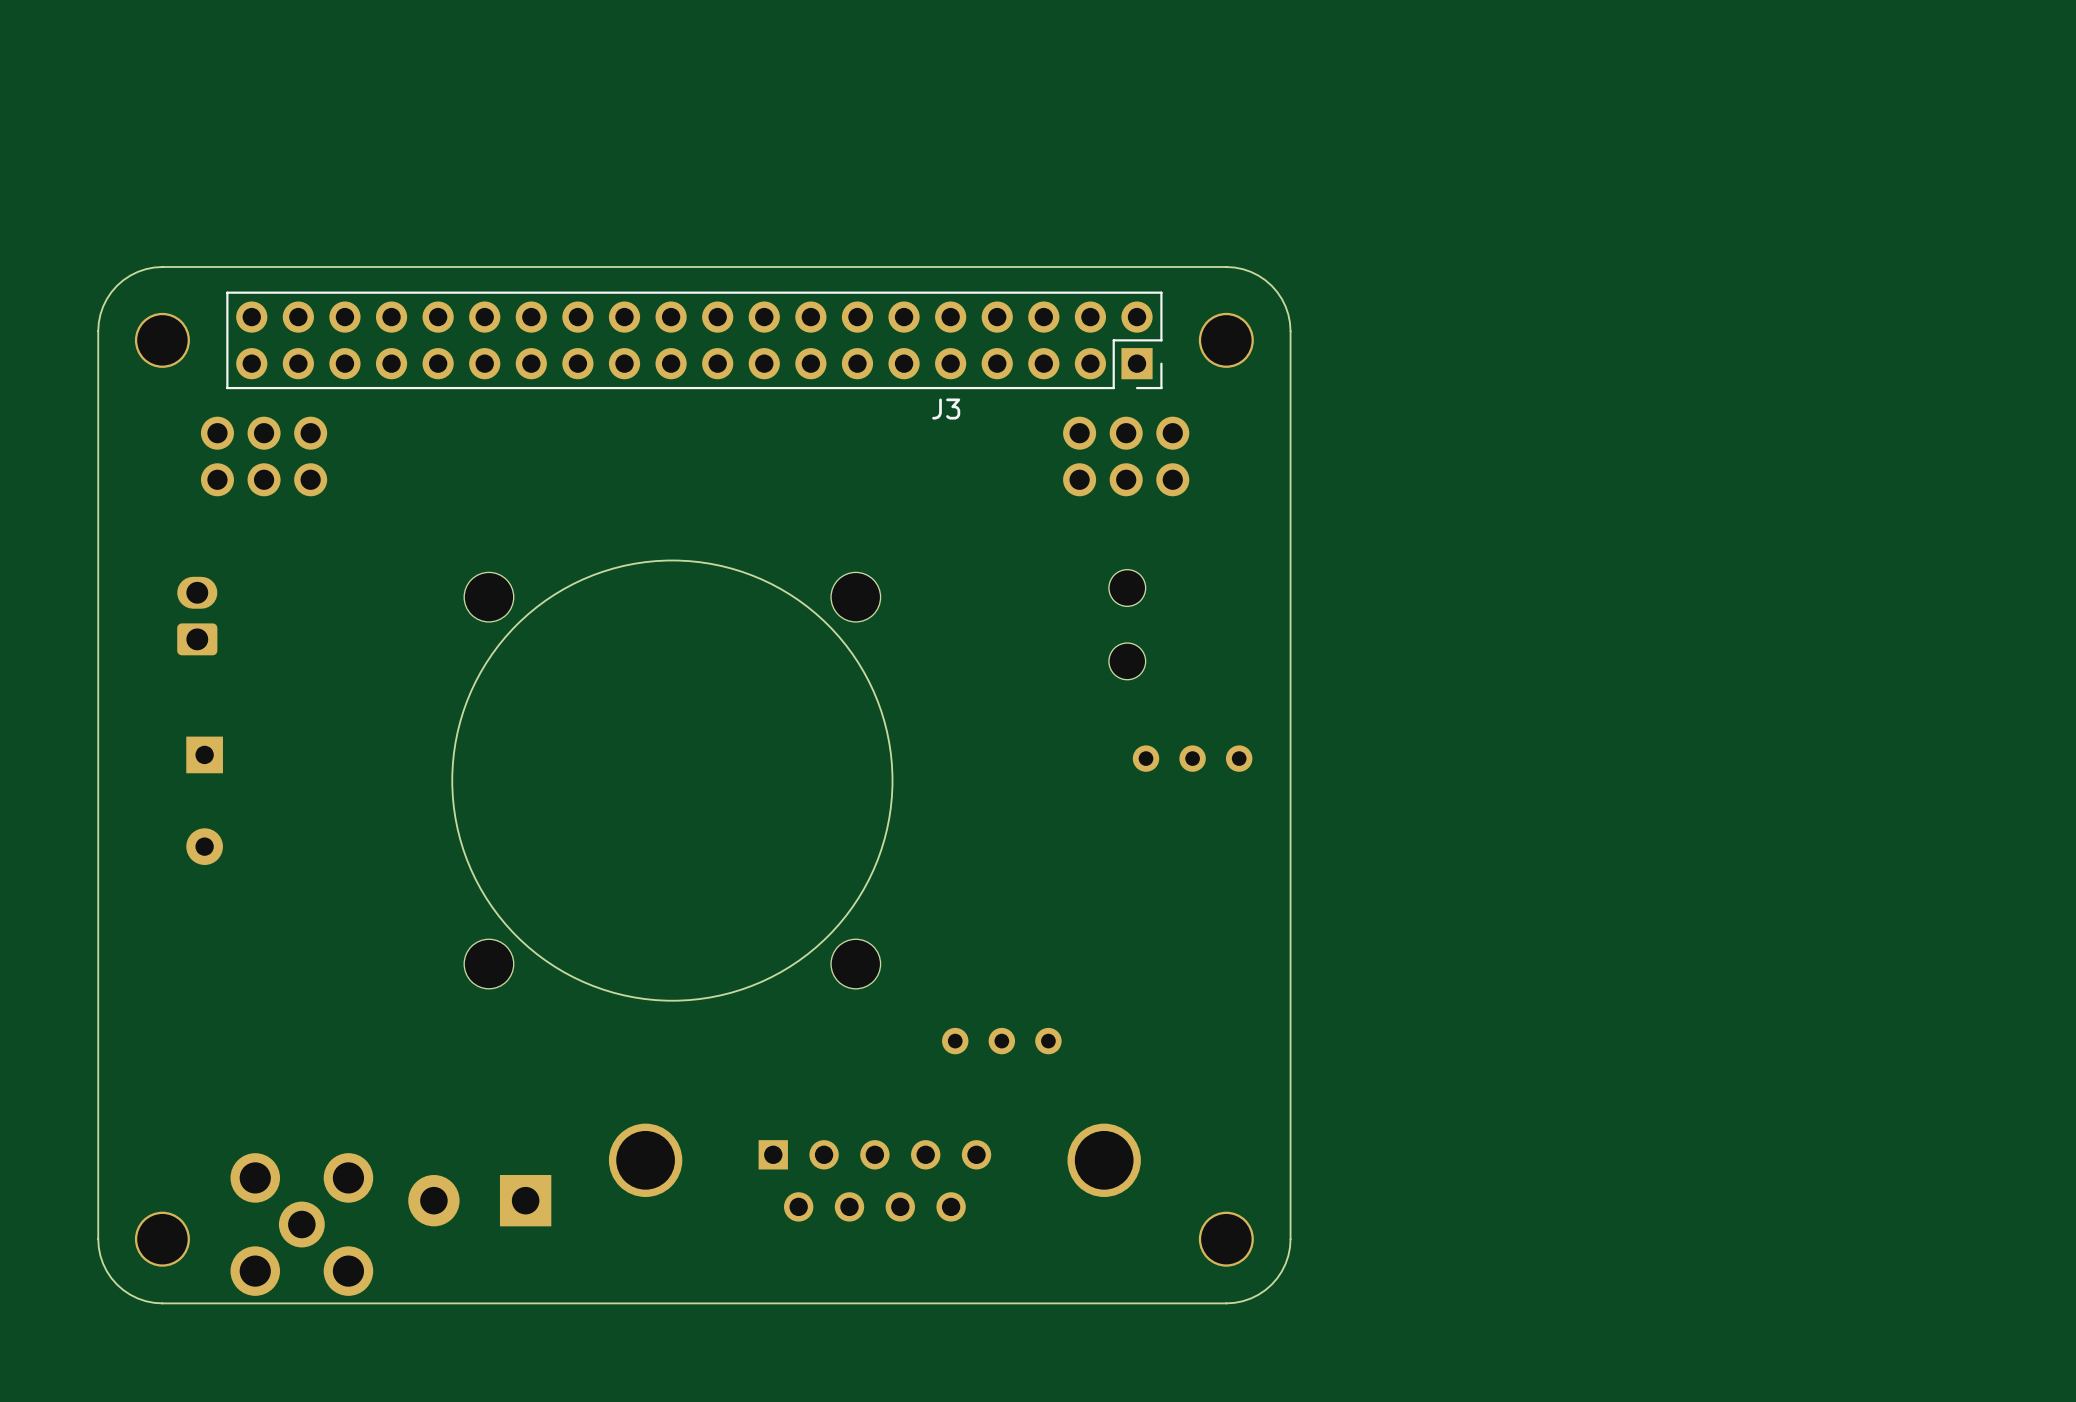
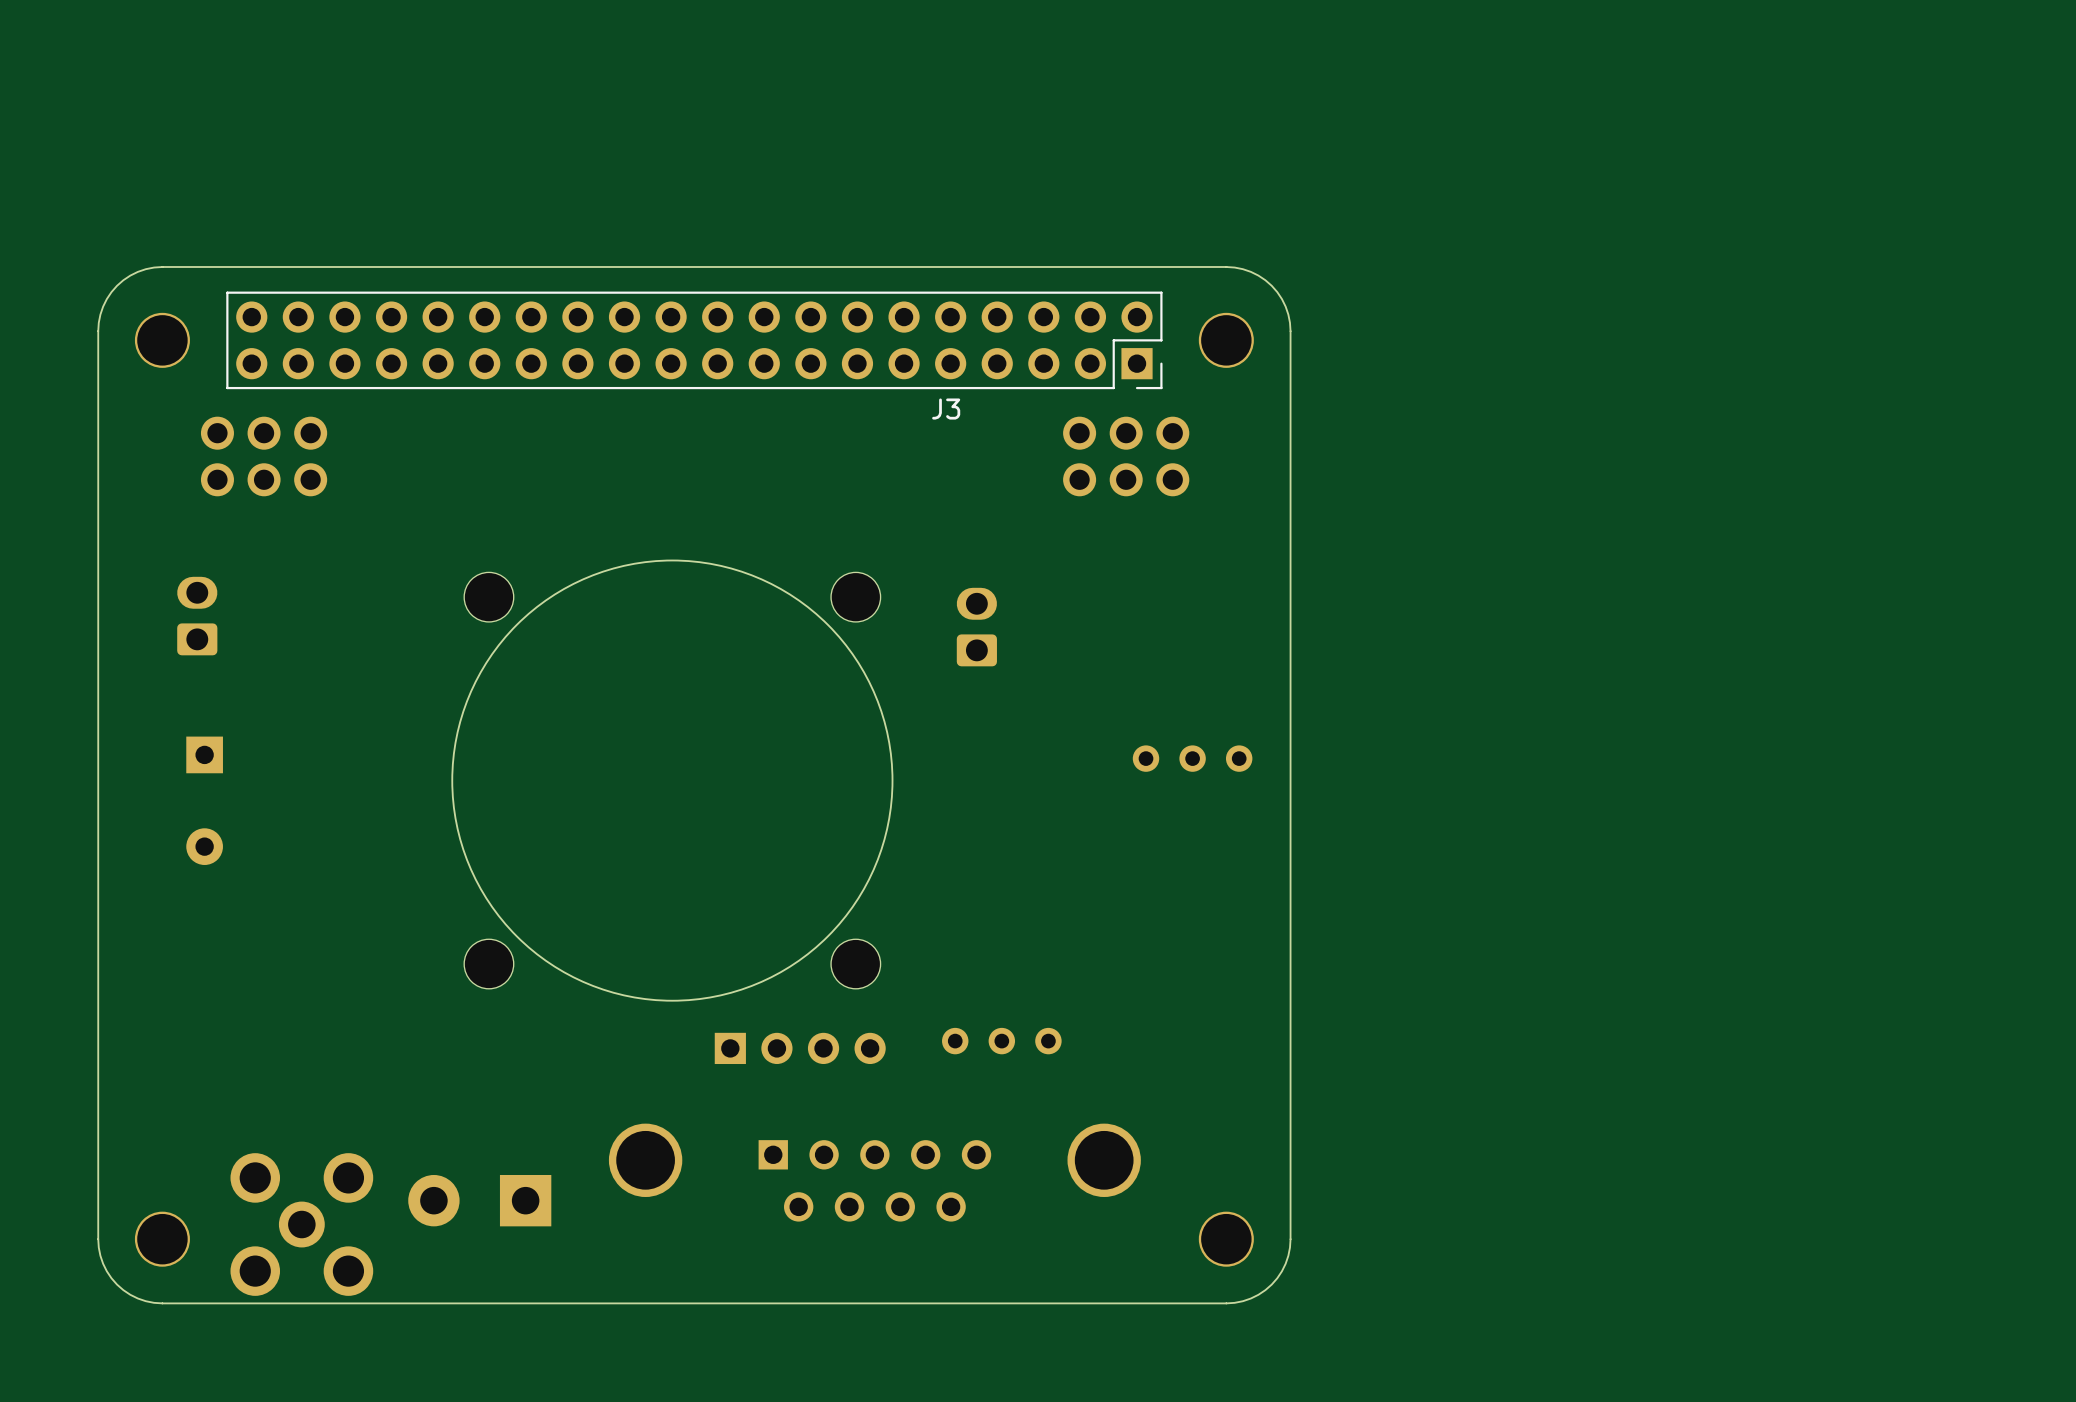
part: (1127, 588) -> none
part: none -> (976, 627)
part: (1127, 661) -> none
part: none -> (800, 1048)

